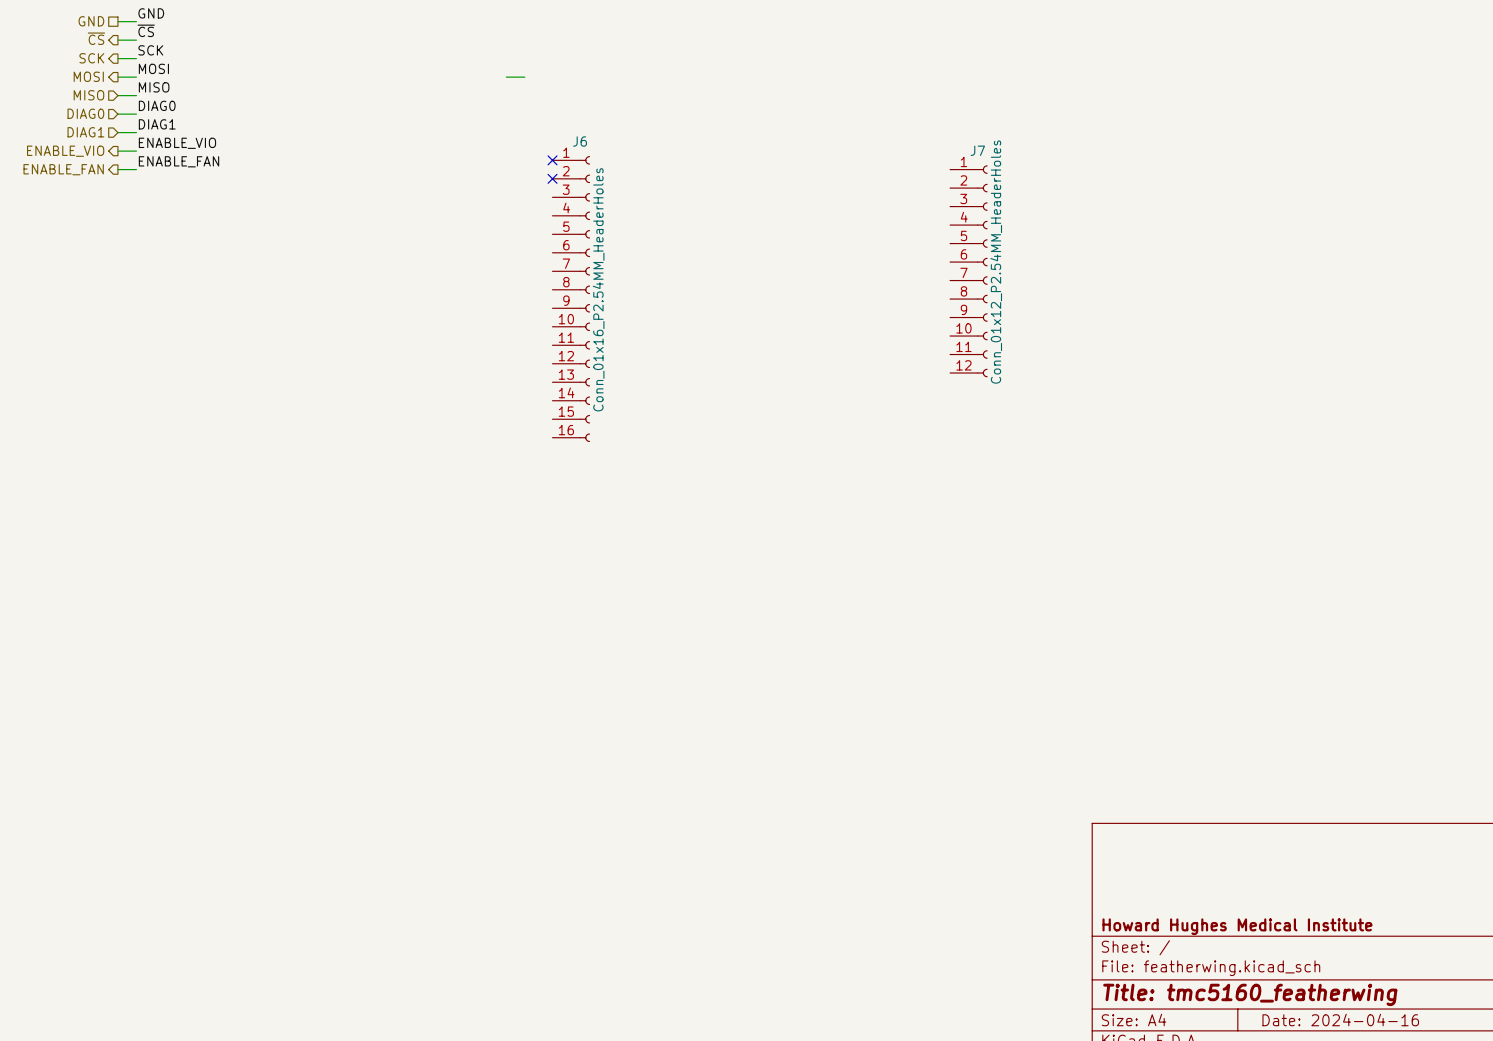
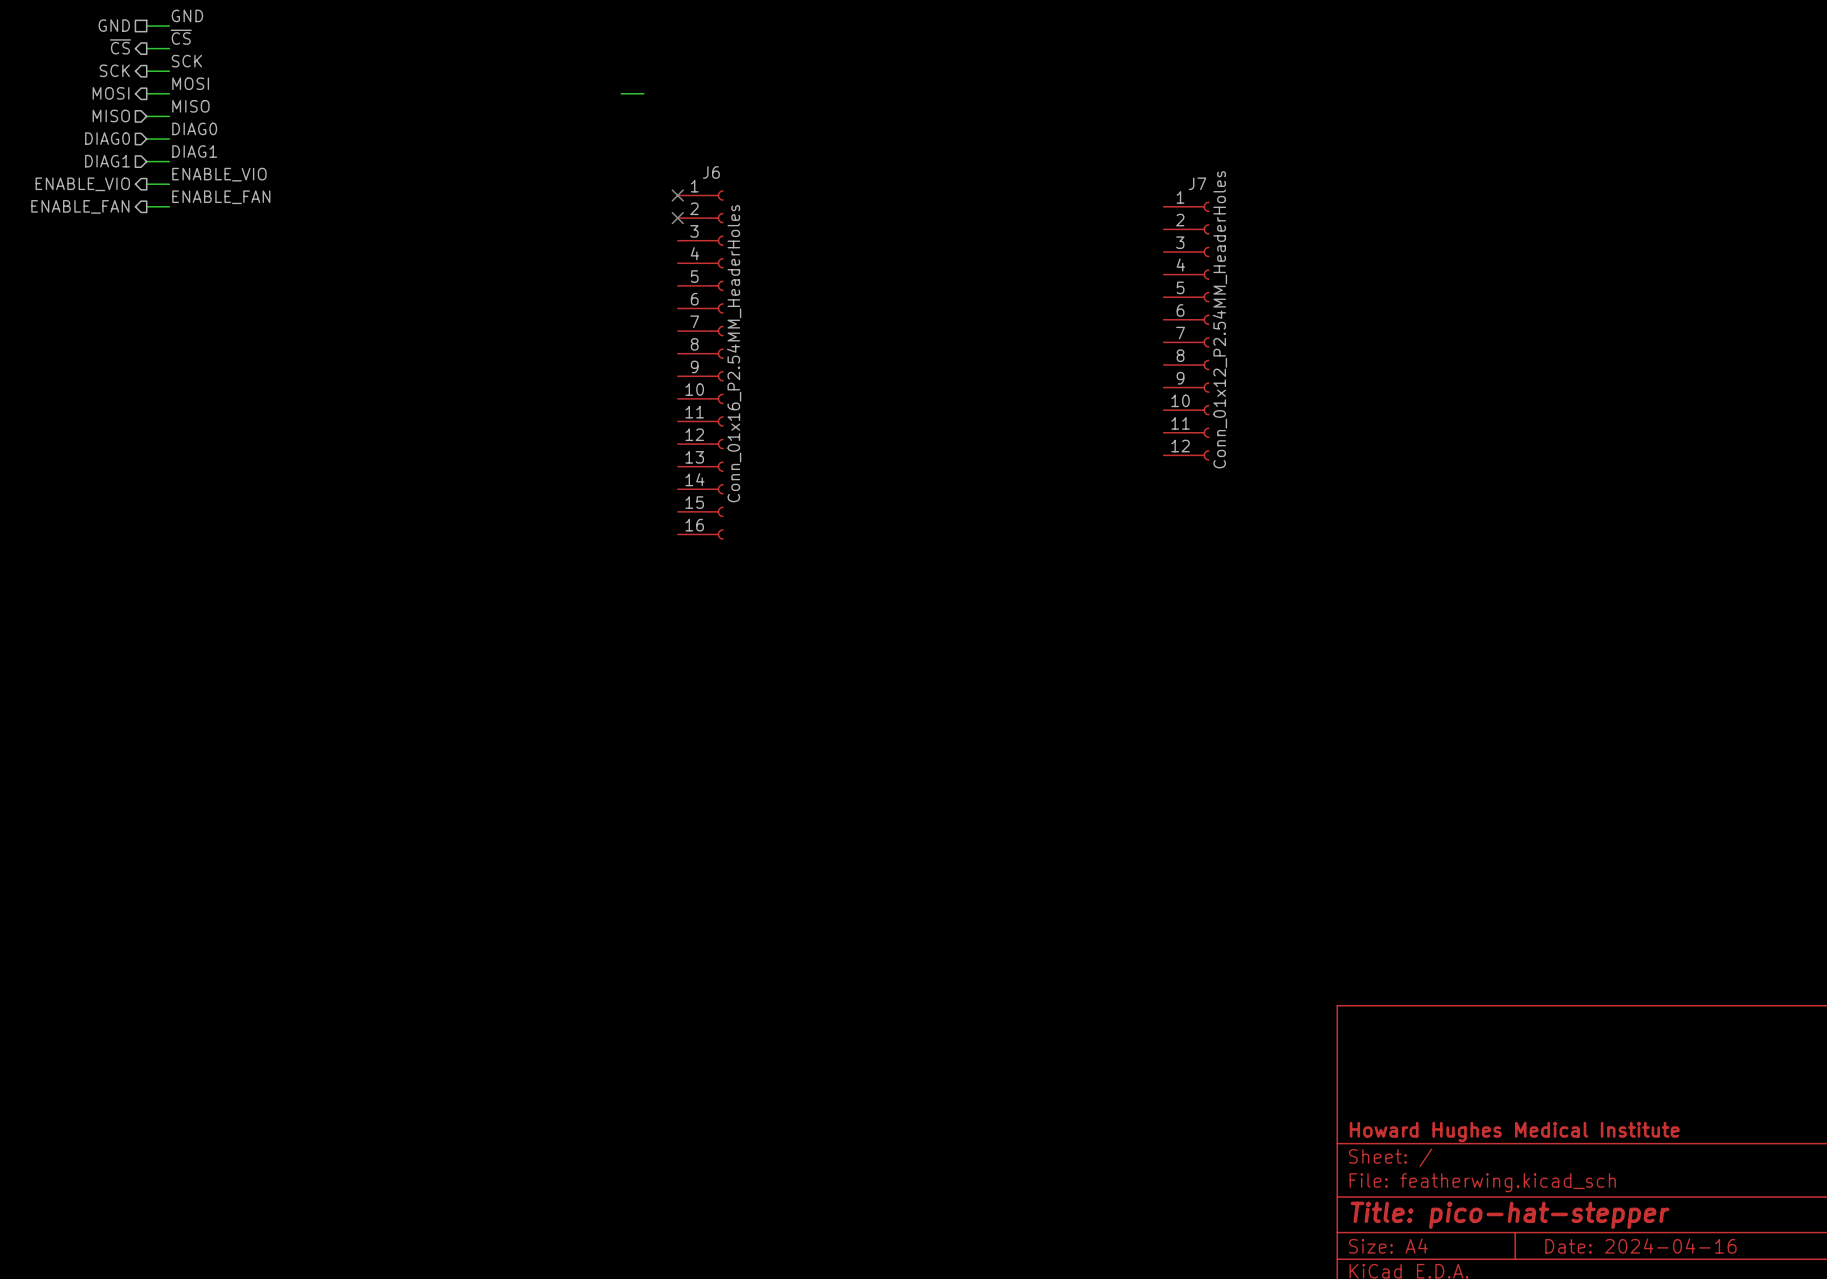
title block: Title: tmc5160_featherwing (1250, 994) -> Title: pico-hat-stepper (1510, 1215)

